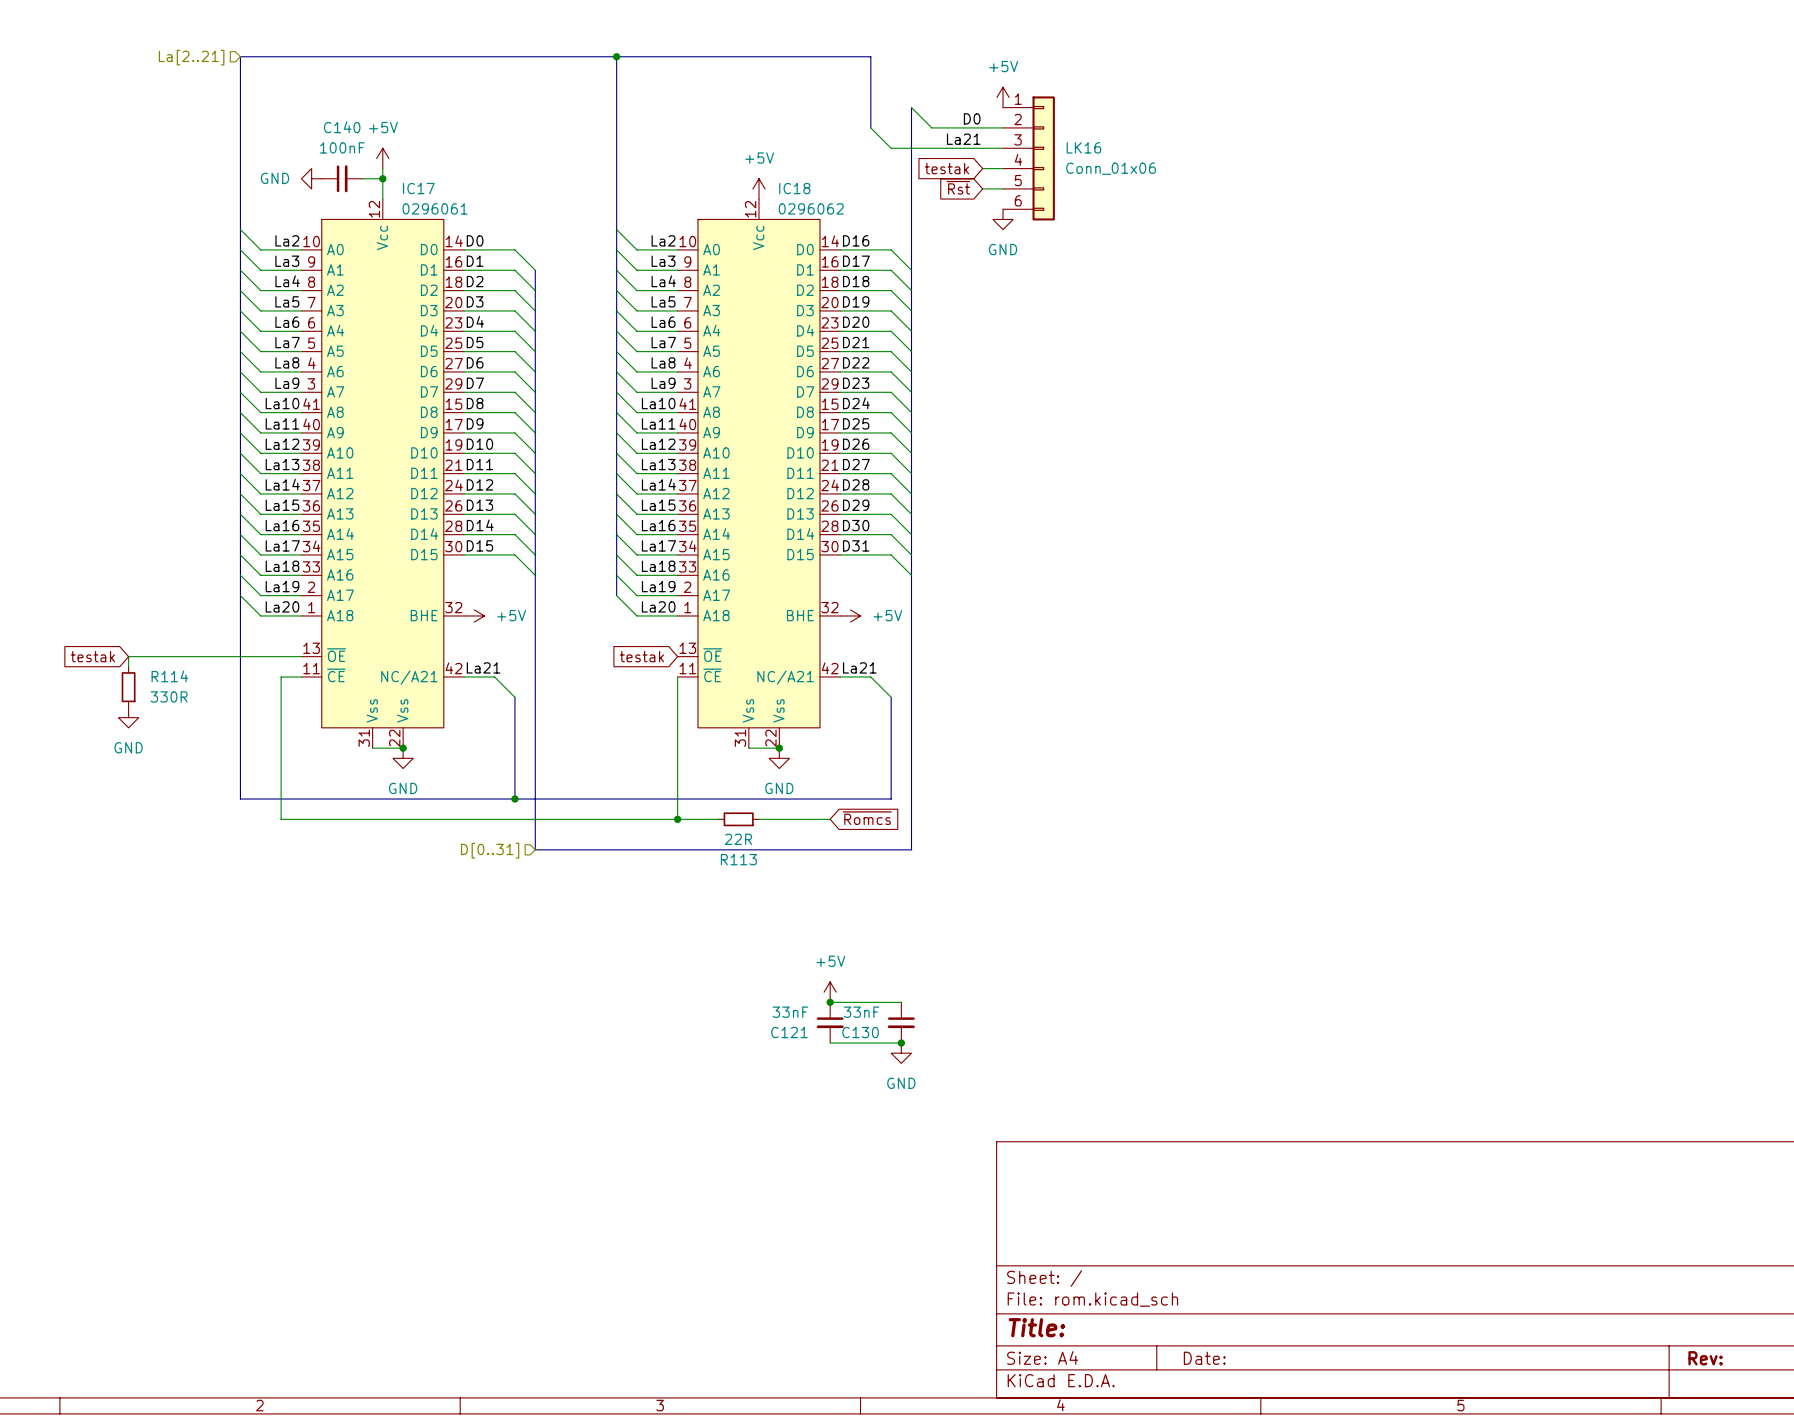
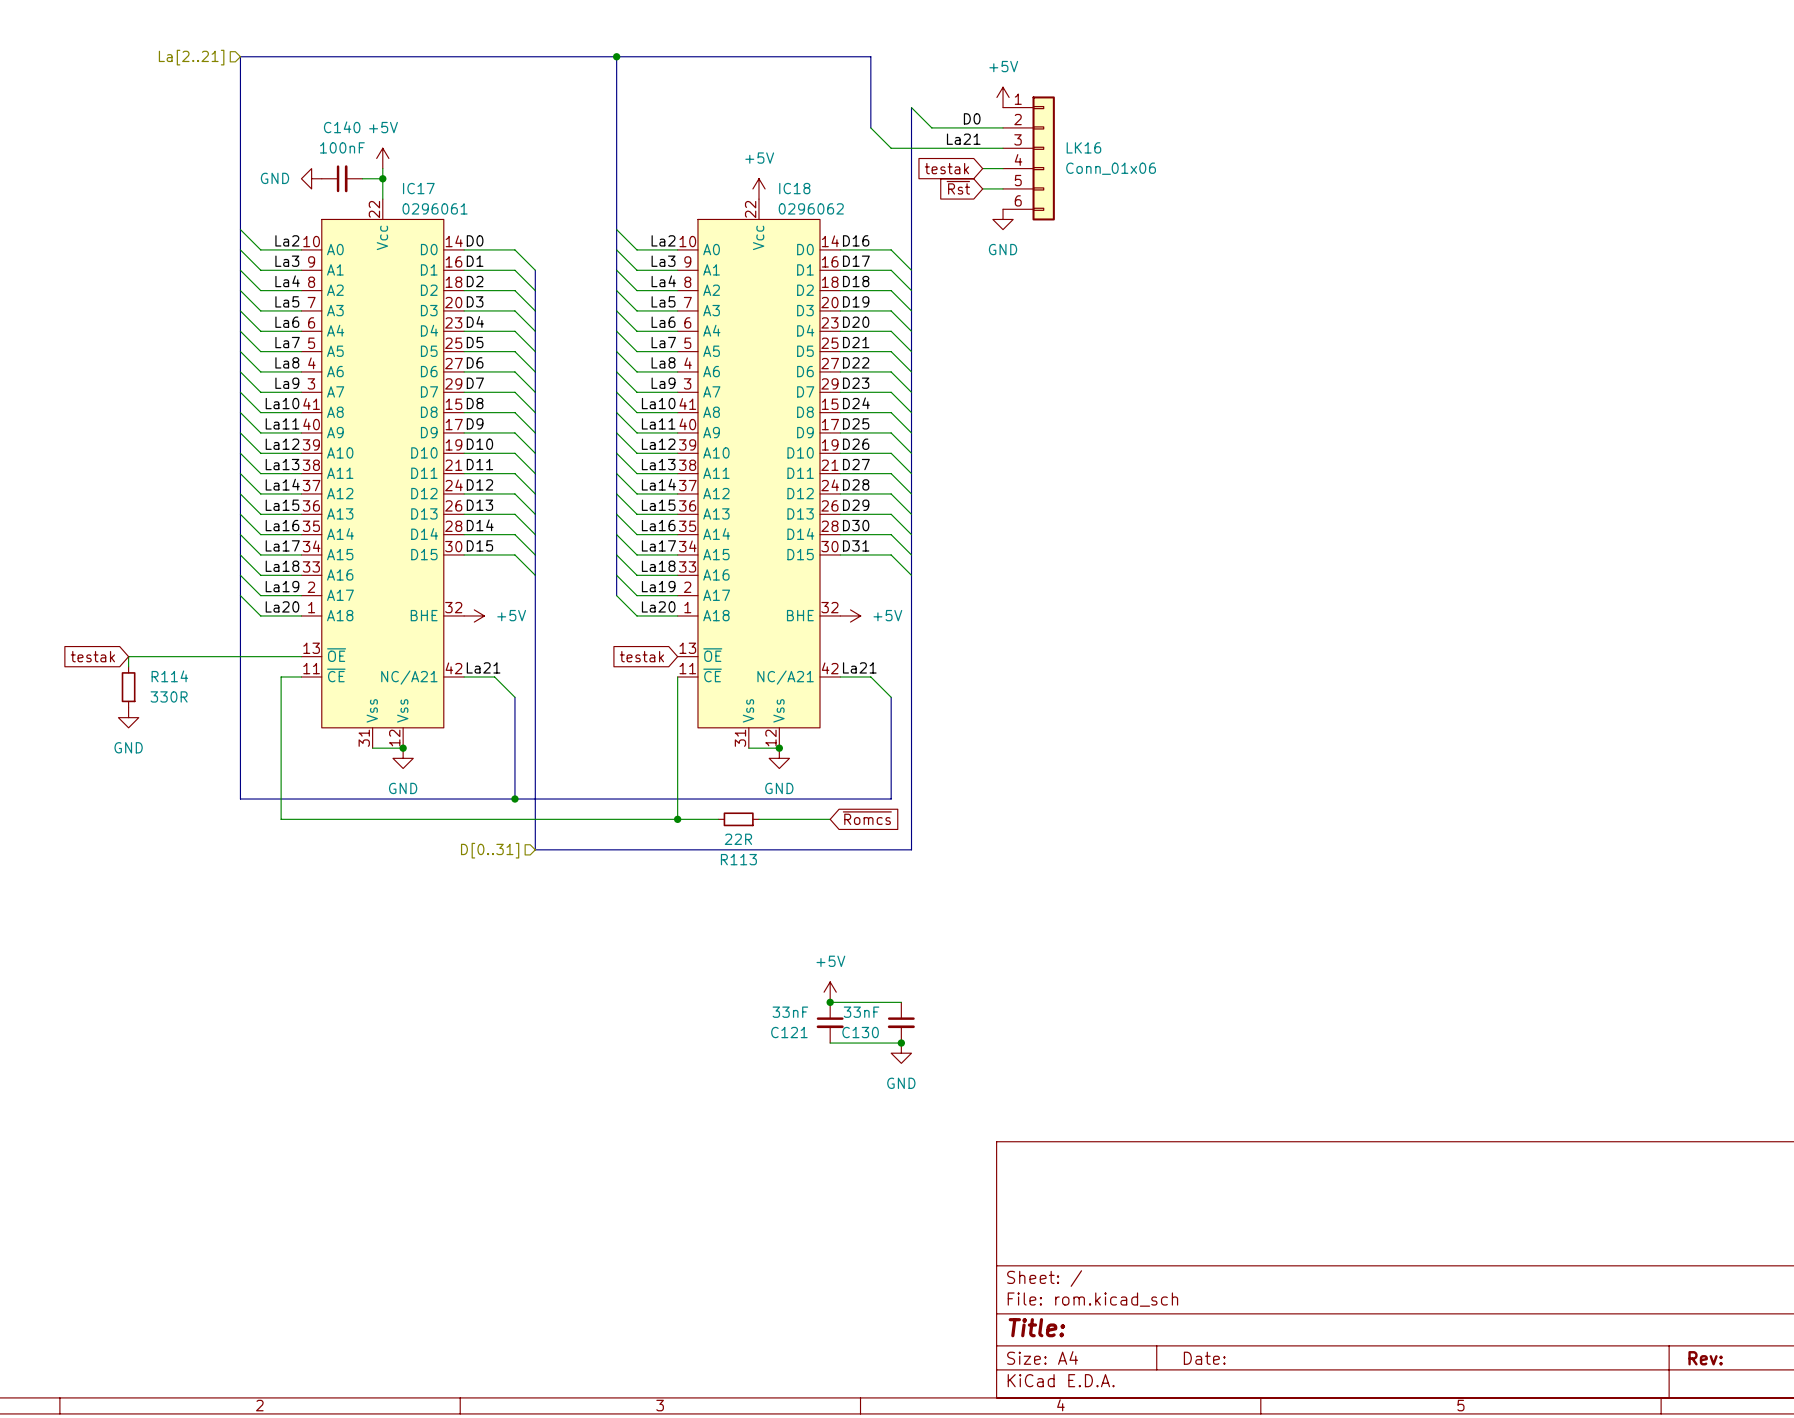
IC17 pin number: 12 (374, 209) -> 22 (374, 209)
IC18 pin number: 12 (750, 209) -> 22 (750, 209)
IC17 pin number: 22 (394, 738) -> 12 (394, 738)
IC18 pin number: 22 (770, 738) -> 12 (770, 738)

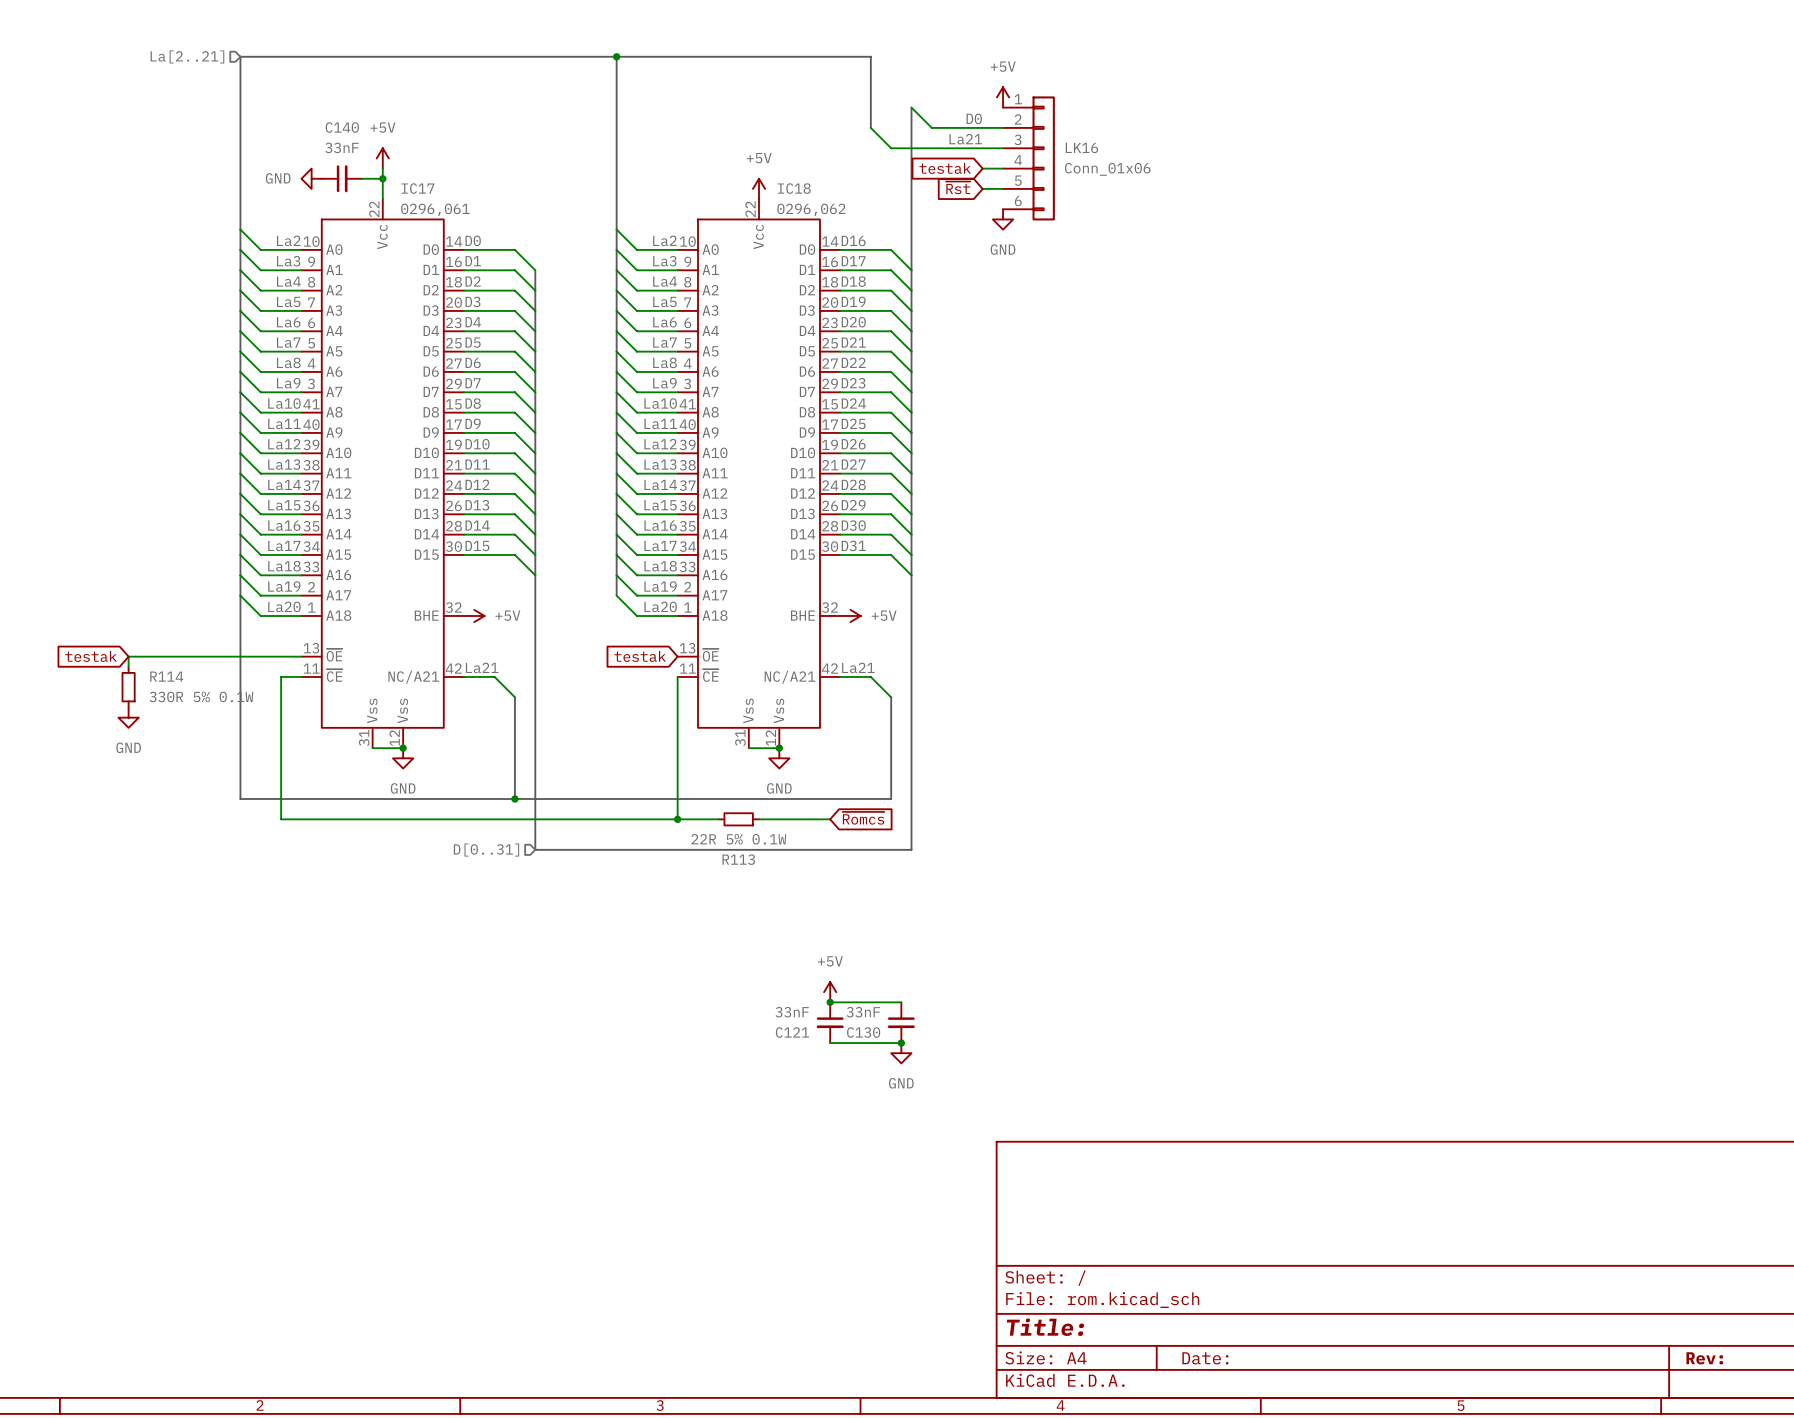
C140 value: 100nF (342, 147) -> 33nF (342, 147)
IC17 value: 0296061 (435, 208) -> 0296,061 (435, 209)
IC18 value: 0296062 (811, 208) -> 0296,062 (811, 209)
R114 value: 330R (169, 696) -> 330R 5% 0.1W (201, 696)
R113 value: 22R (738, 839) -> 22R 5% 0.1W (738, 839)

